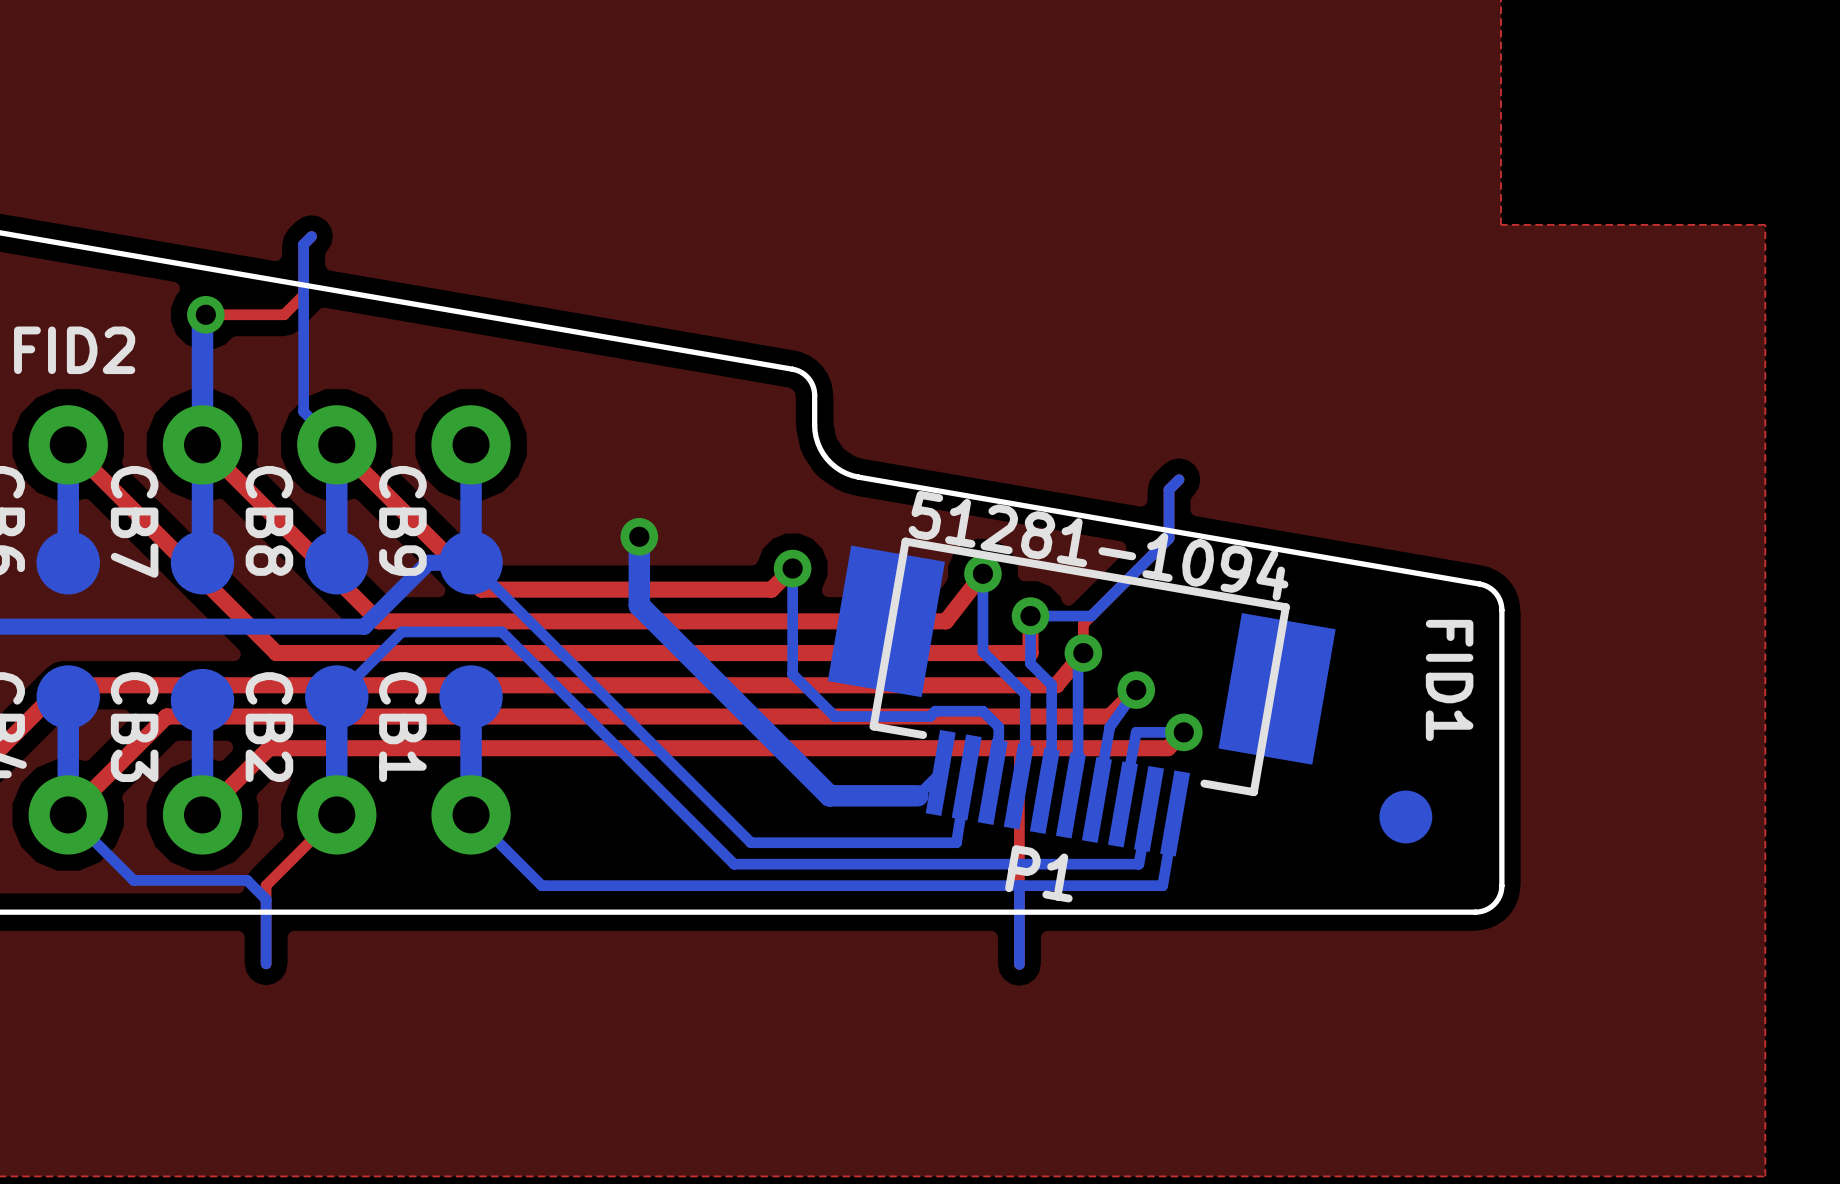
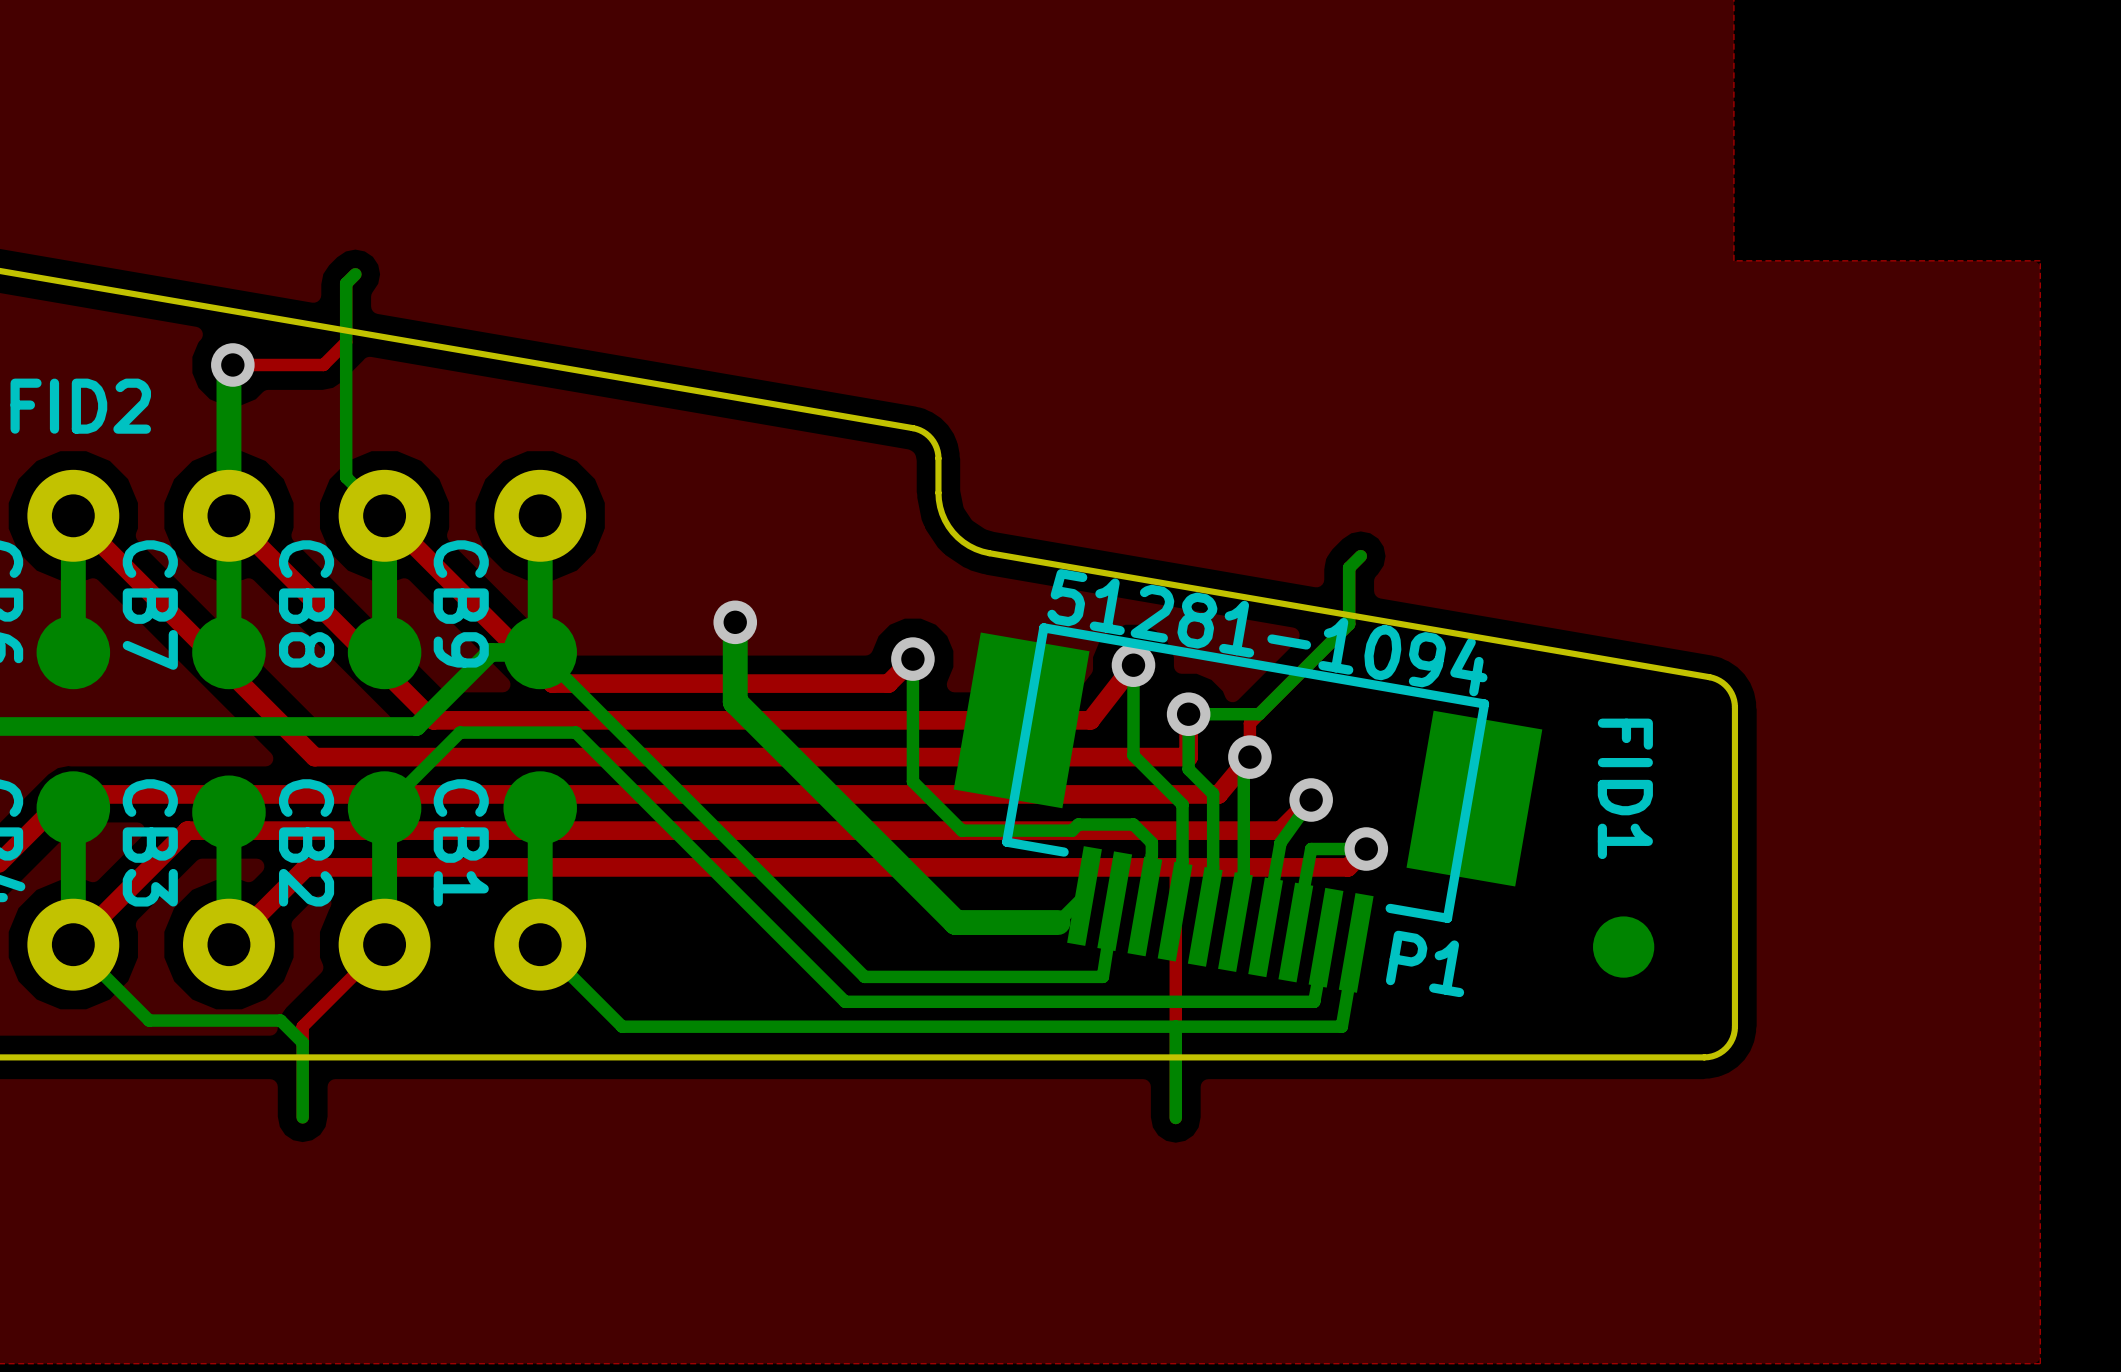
FID1 name position: FID1 (1449, 680) -> FID1 (1625, 788)
P1 name position: P1 (1038, 873) -> P1 (1425, 963)

